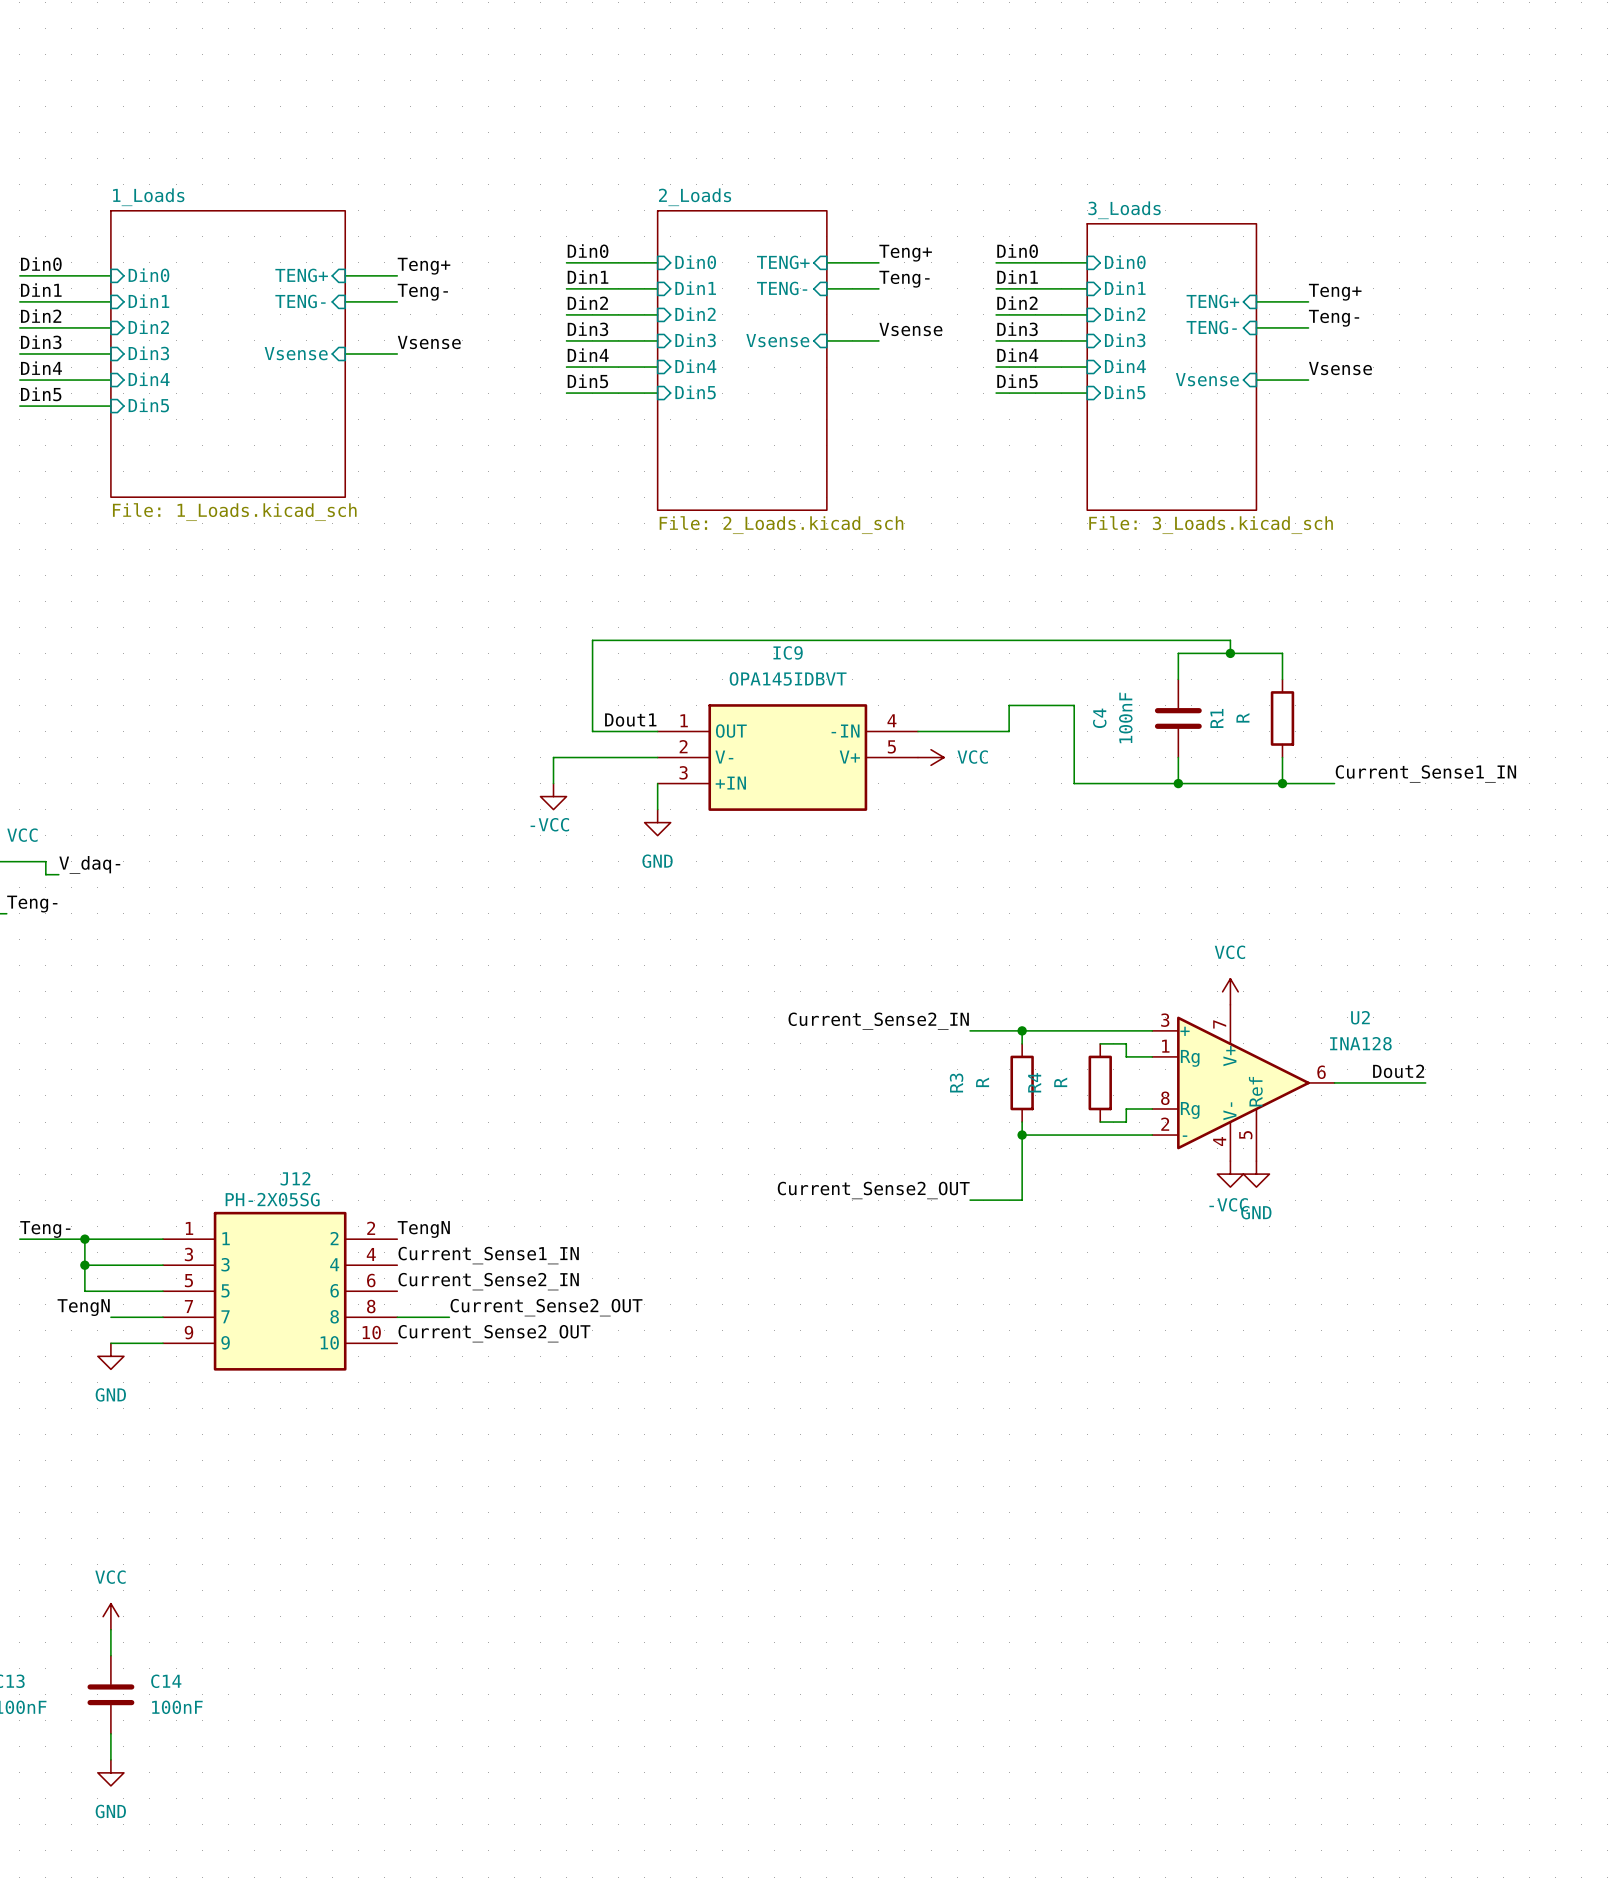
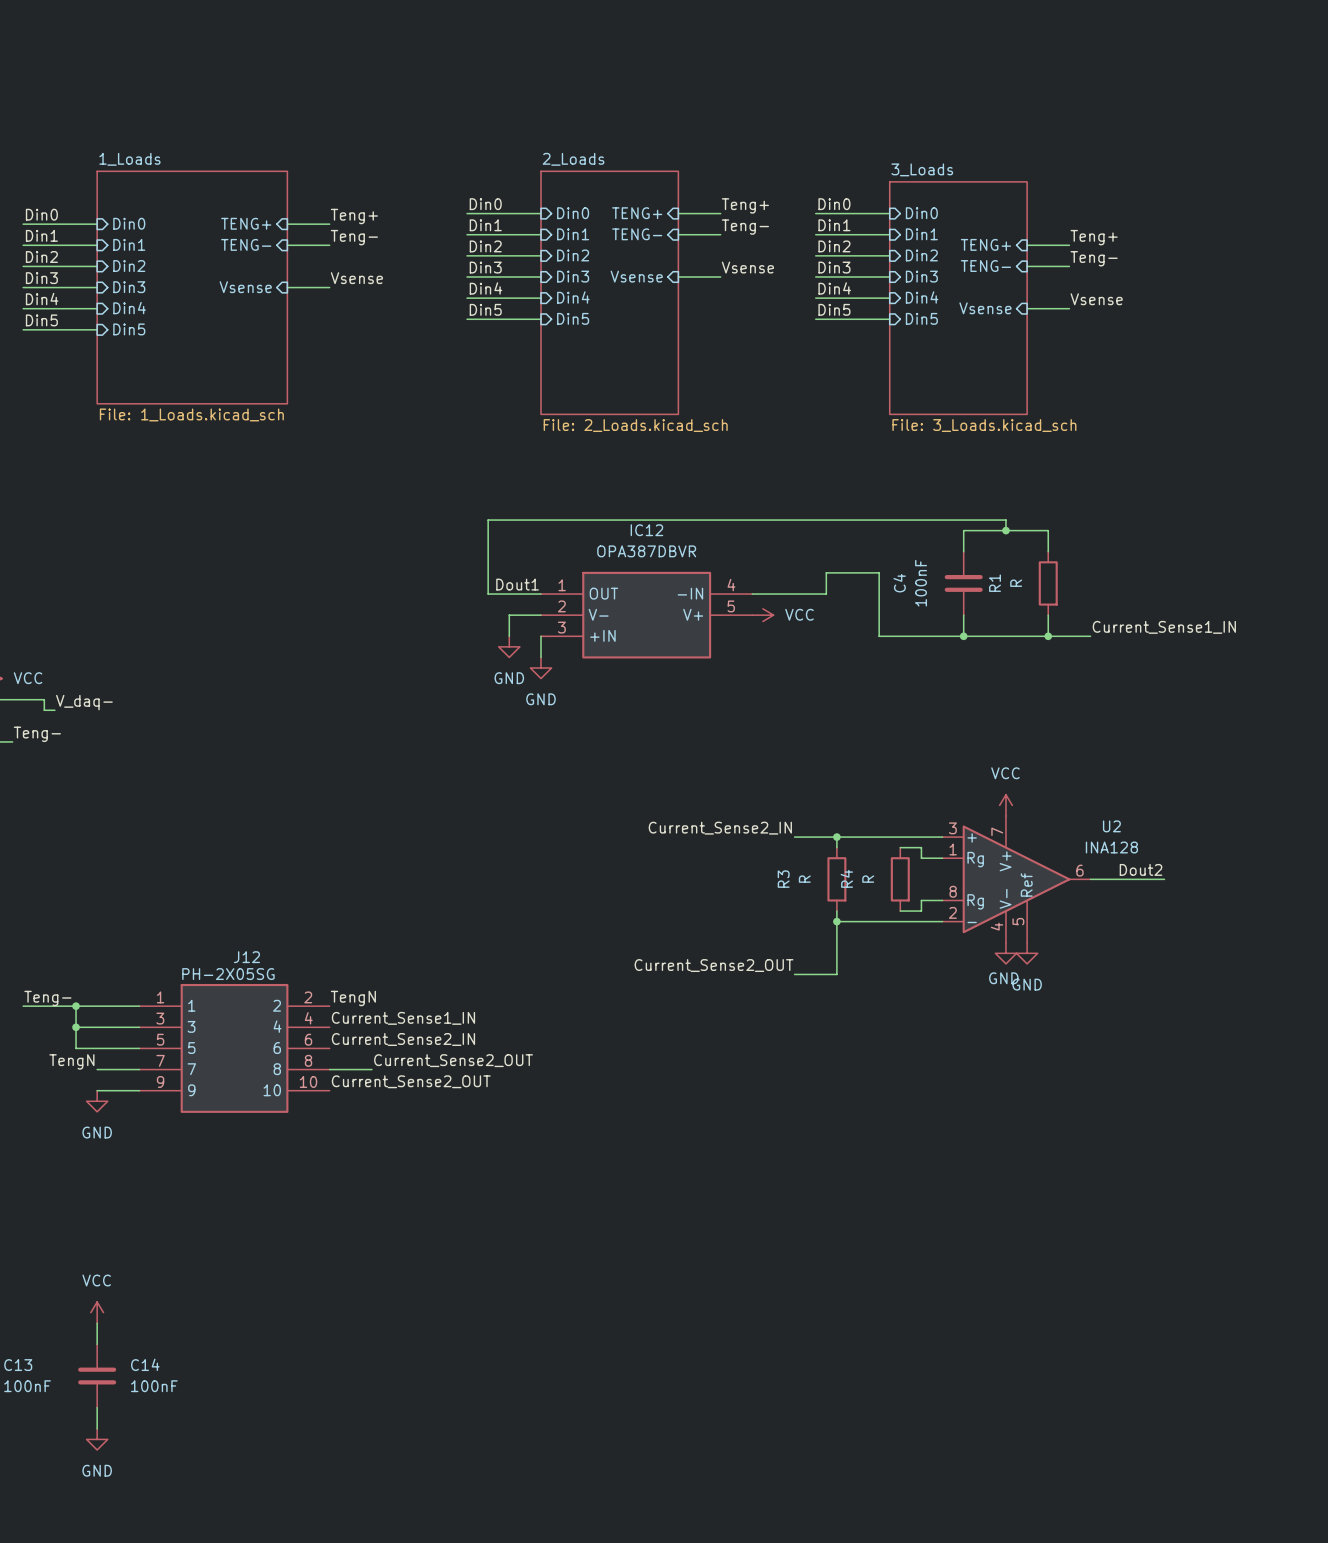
IC9 name: IC9 (788, 652) -> IC12 (646, 530)
IC9 value: OPA145IDBVT (788, 678) -> OPA387DBVR (646, 551)
wire: (618, 757) (553, 757) (553, 783) -> (509, 615) (509, 636)
power symbol: -VCC (553, 796) -> none
power symbol: none -> GND (509, 646)
power symbol: -VCC (1230, 1174) -> GND (1005, 953)

